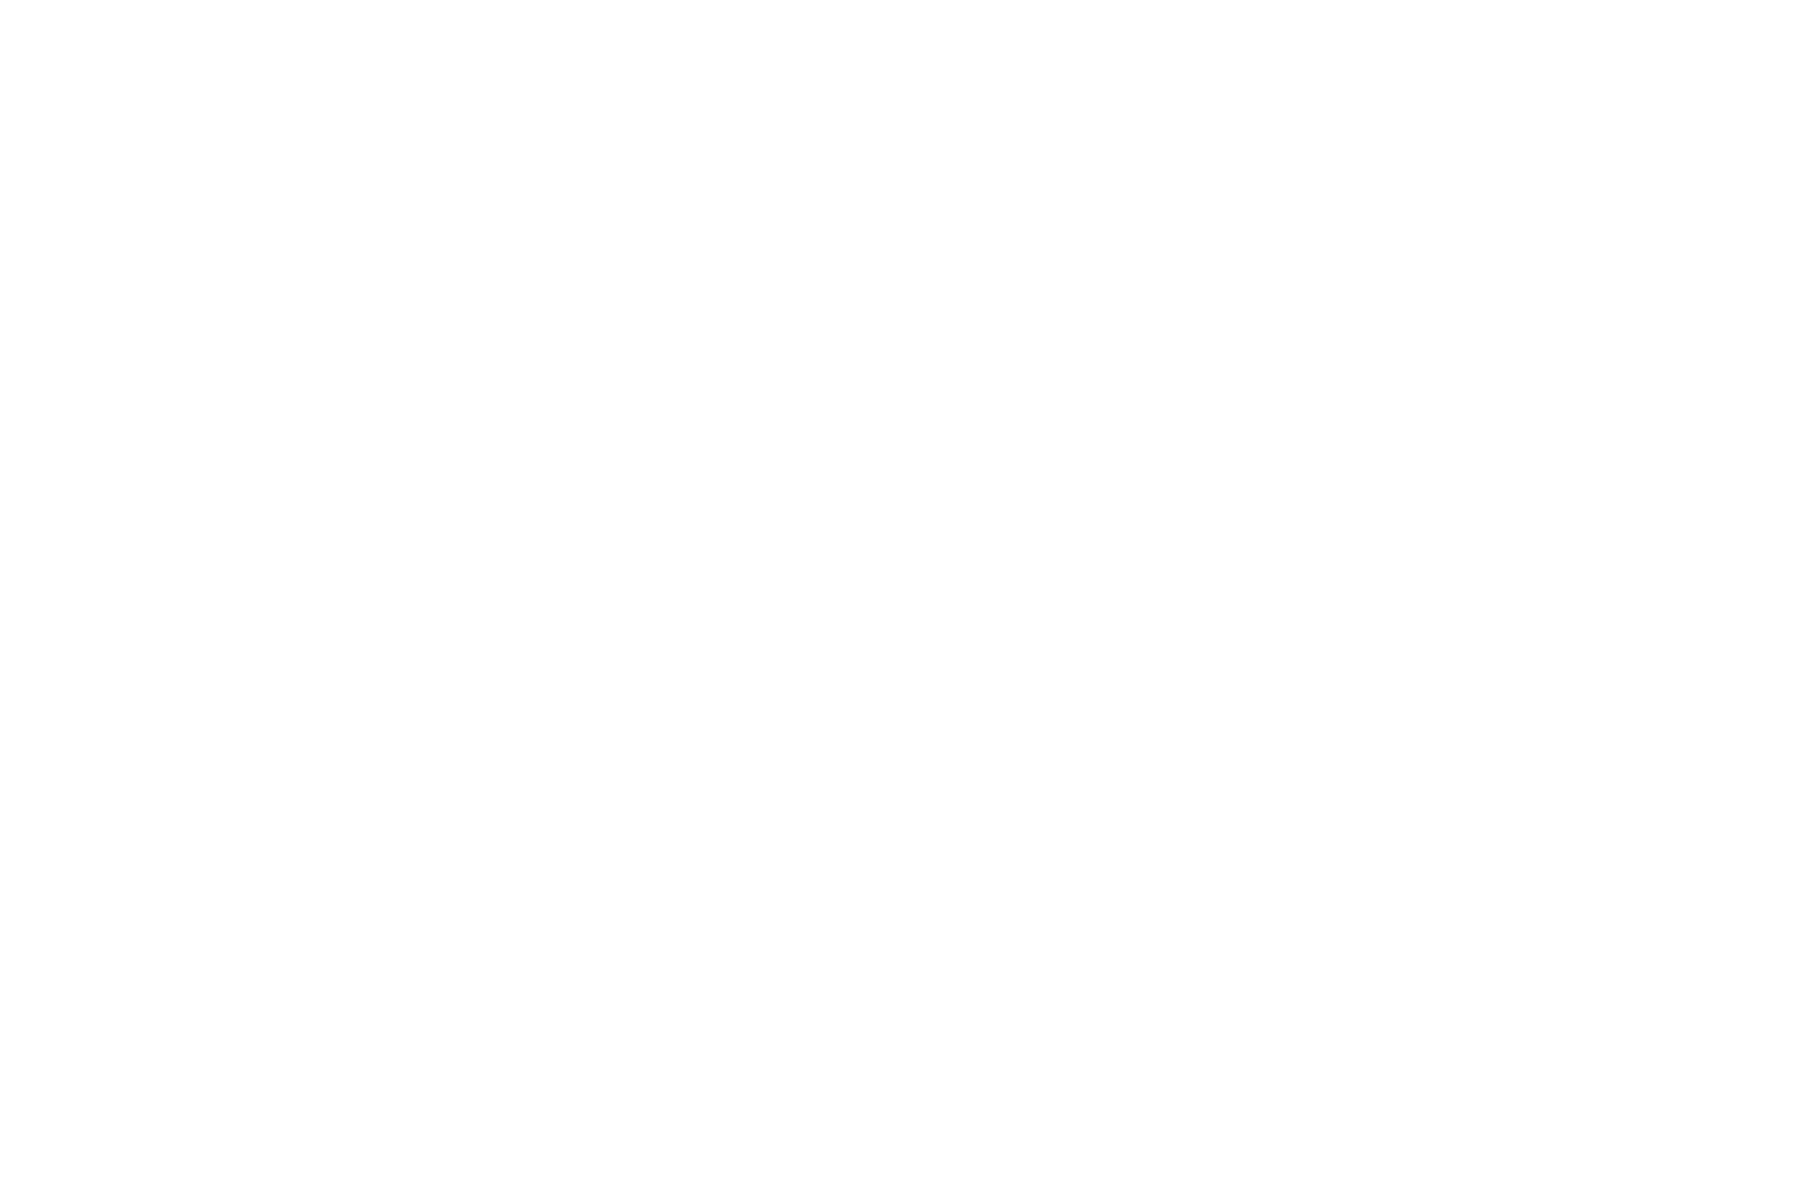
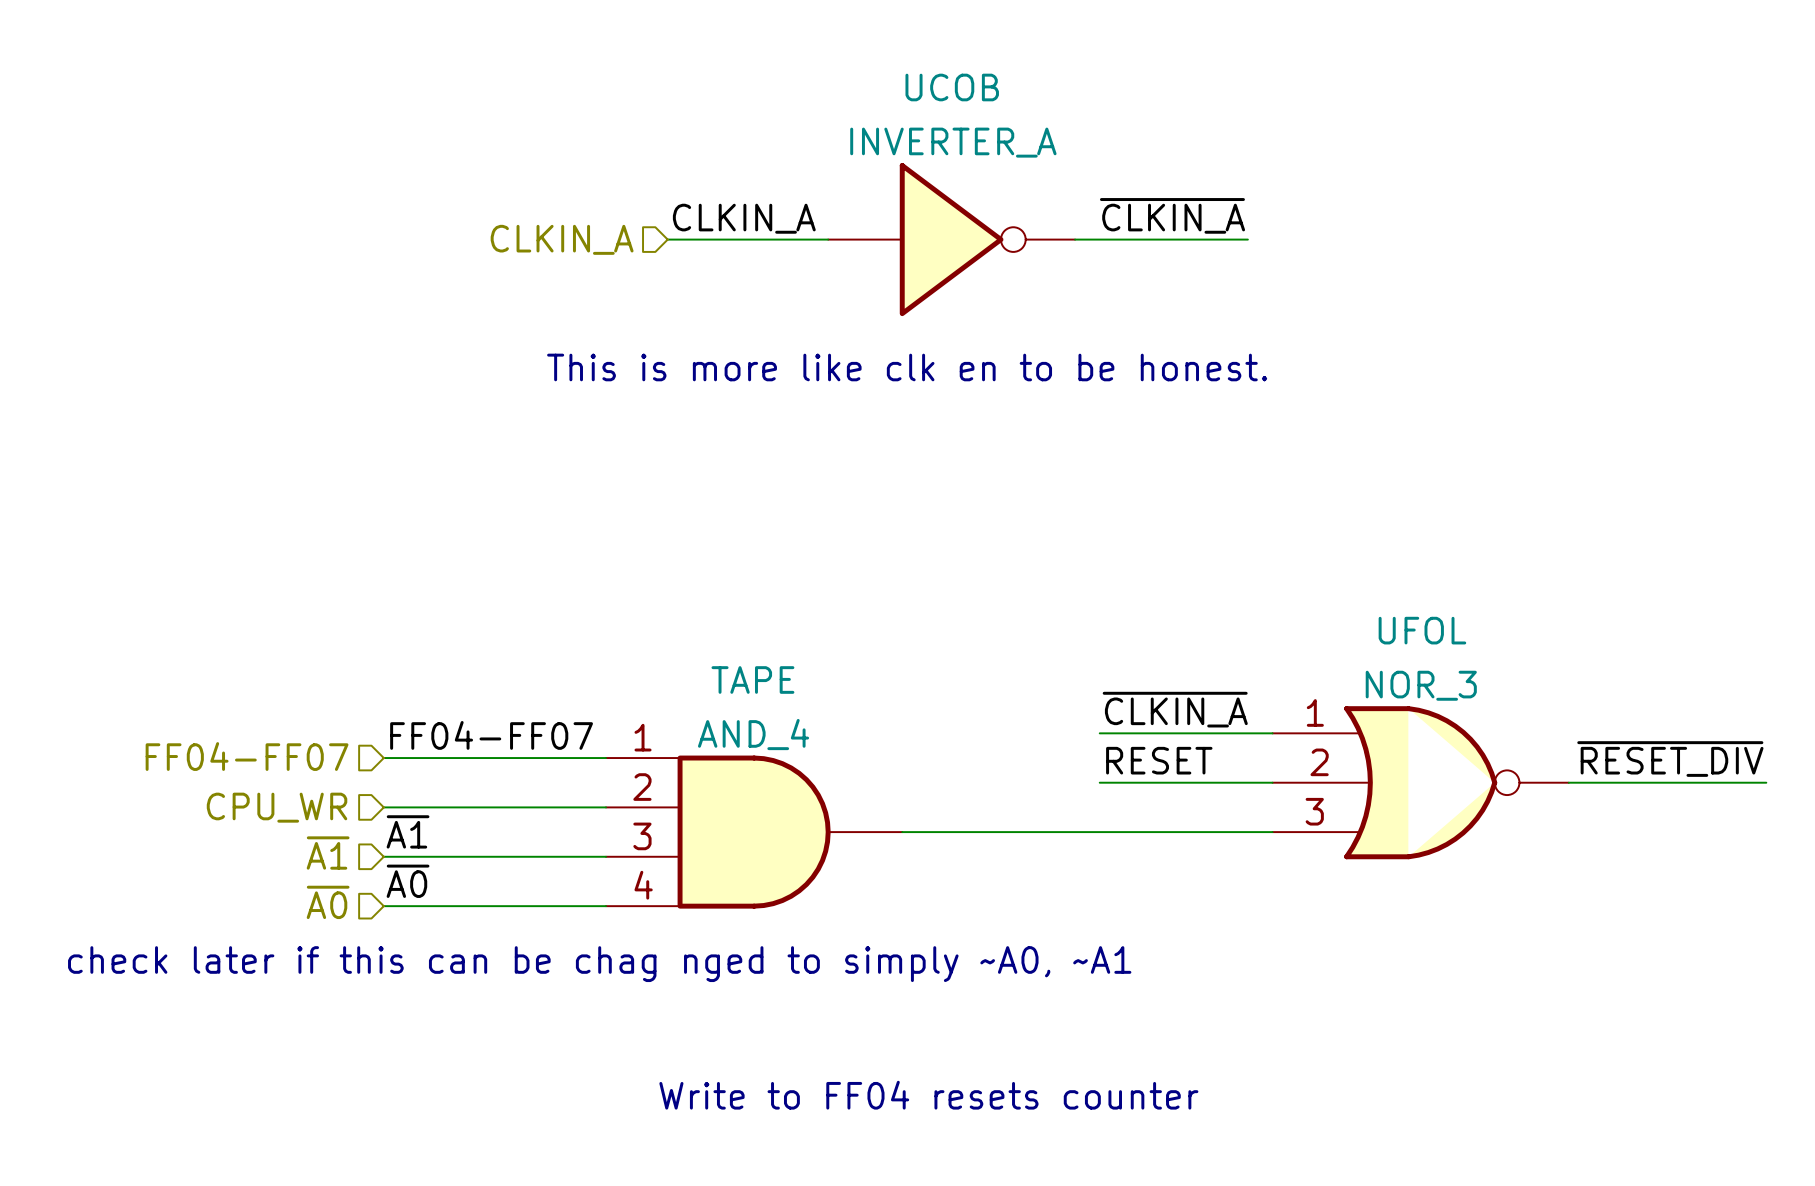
label: none -> ~{CLKIN_A} (1172, 215)
label: none -> CLKIN_A (744, 218)
hierarchical label: none -> CLKIN_A (562, 239)
wire: none -> (667, 239) (828, 239)
UCOB: none -> INVERTER_A (951, 239)
wire: none -> (1075, 239) (1247, 239)
text: none -> This is more like clk en to be honest. (907, 367)
label: none -> ~{CLKIN_A} (1175, 709)
wire: none -> (1099, 733) (1272, 733)
label: none -> FF04-FF07 (491, 735)
hierarchical label: none -> FF04-FF07 (247, 756)
wire: none -> (383, 758) (605, 758)
label: none -> ~{RESET_DIV} (1670, 759)
label: none -> RESET (1159, 760)
wire: none -> (1099, 782) (1272, 782)
UFOL: none -> NOR_3 (1420, 782)
wire: none -> (1568, 782) (1766, 782)
hierarchical label: none -> CPU_WR (277, 807)
wire: none -> (383, 807) (605, 807)
label: none -> ~{A1} (408, 831)
TAPE: none -> AND_4 (754, 832)
wire: none -> (902, 832) (1272, 832)
hierarchical label: none -> ~{A1} (328, 853)
wire: none -> (383, 856) (605, 856)
label: none -> ~{A0} (408, 881)
hierarchical label: none -> ~{A0} (328, 902)
wire: none -> (383, 906) (605, 906)
text: none -> check later if this can be chag nged to simply ~A0, ~A1 (599, 964)
text: none -> Write to FF04 resets counter (928, 1095)

